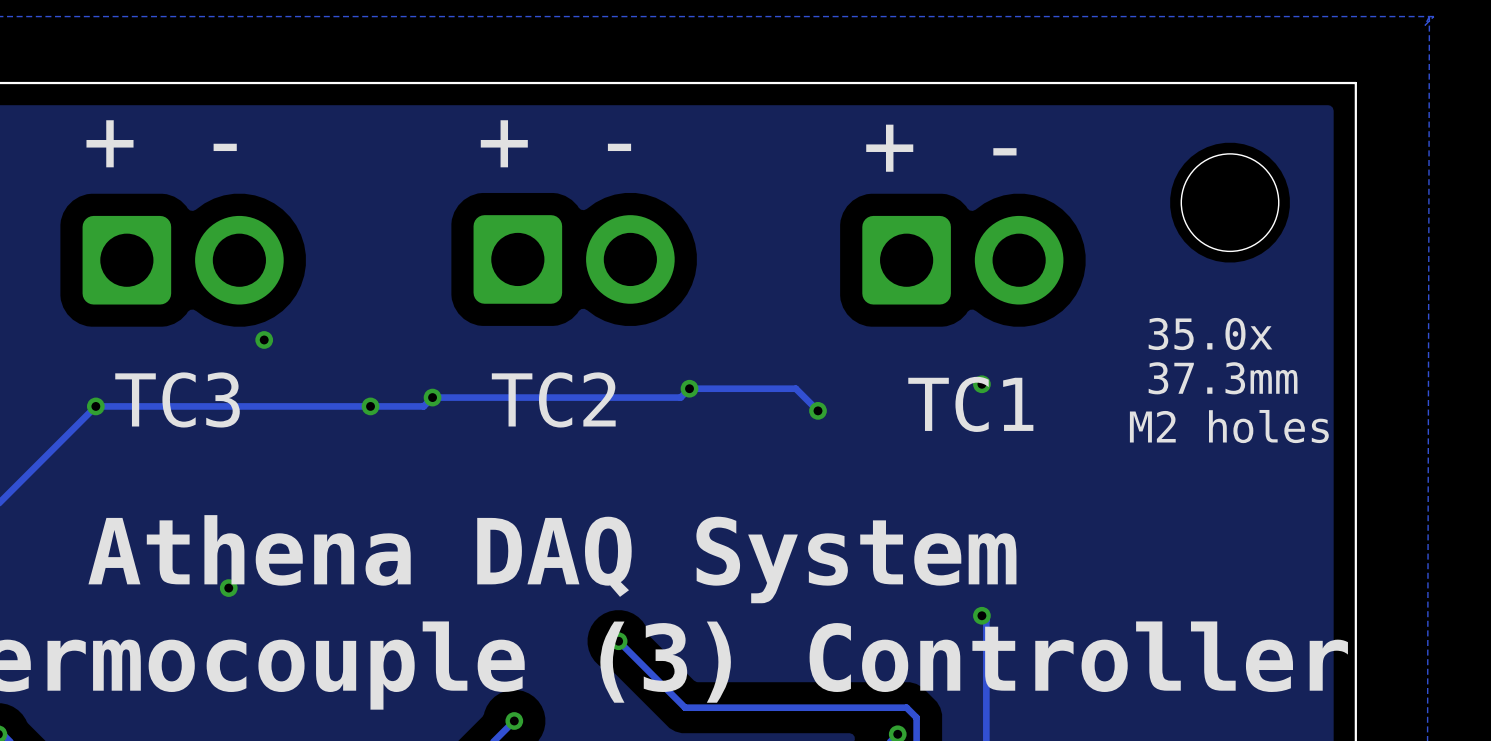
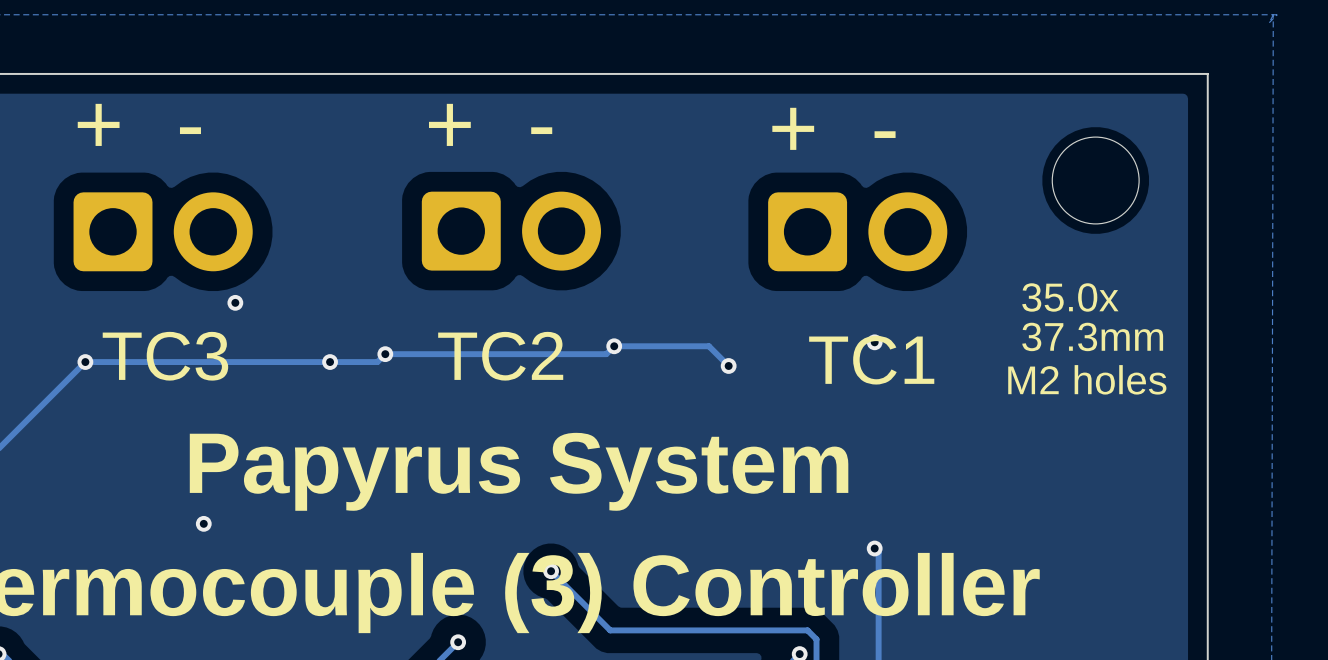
text: none -> Papyrus System (519, 471)
text: Athena DAQ System (552, 559) -> none

